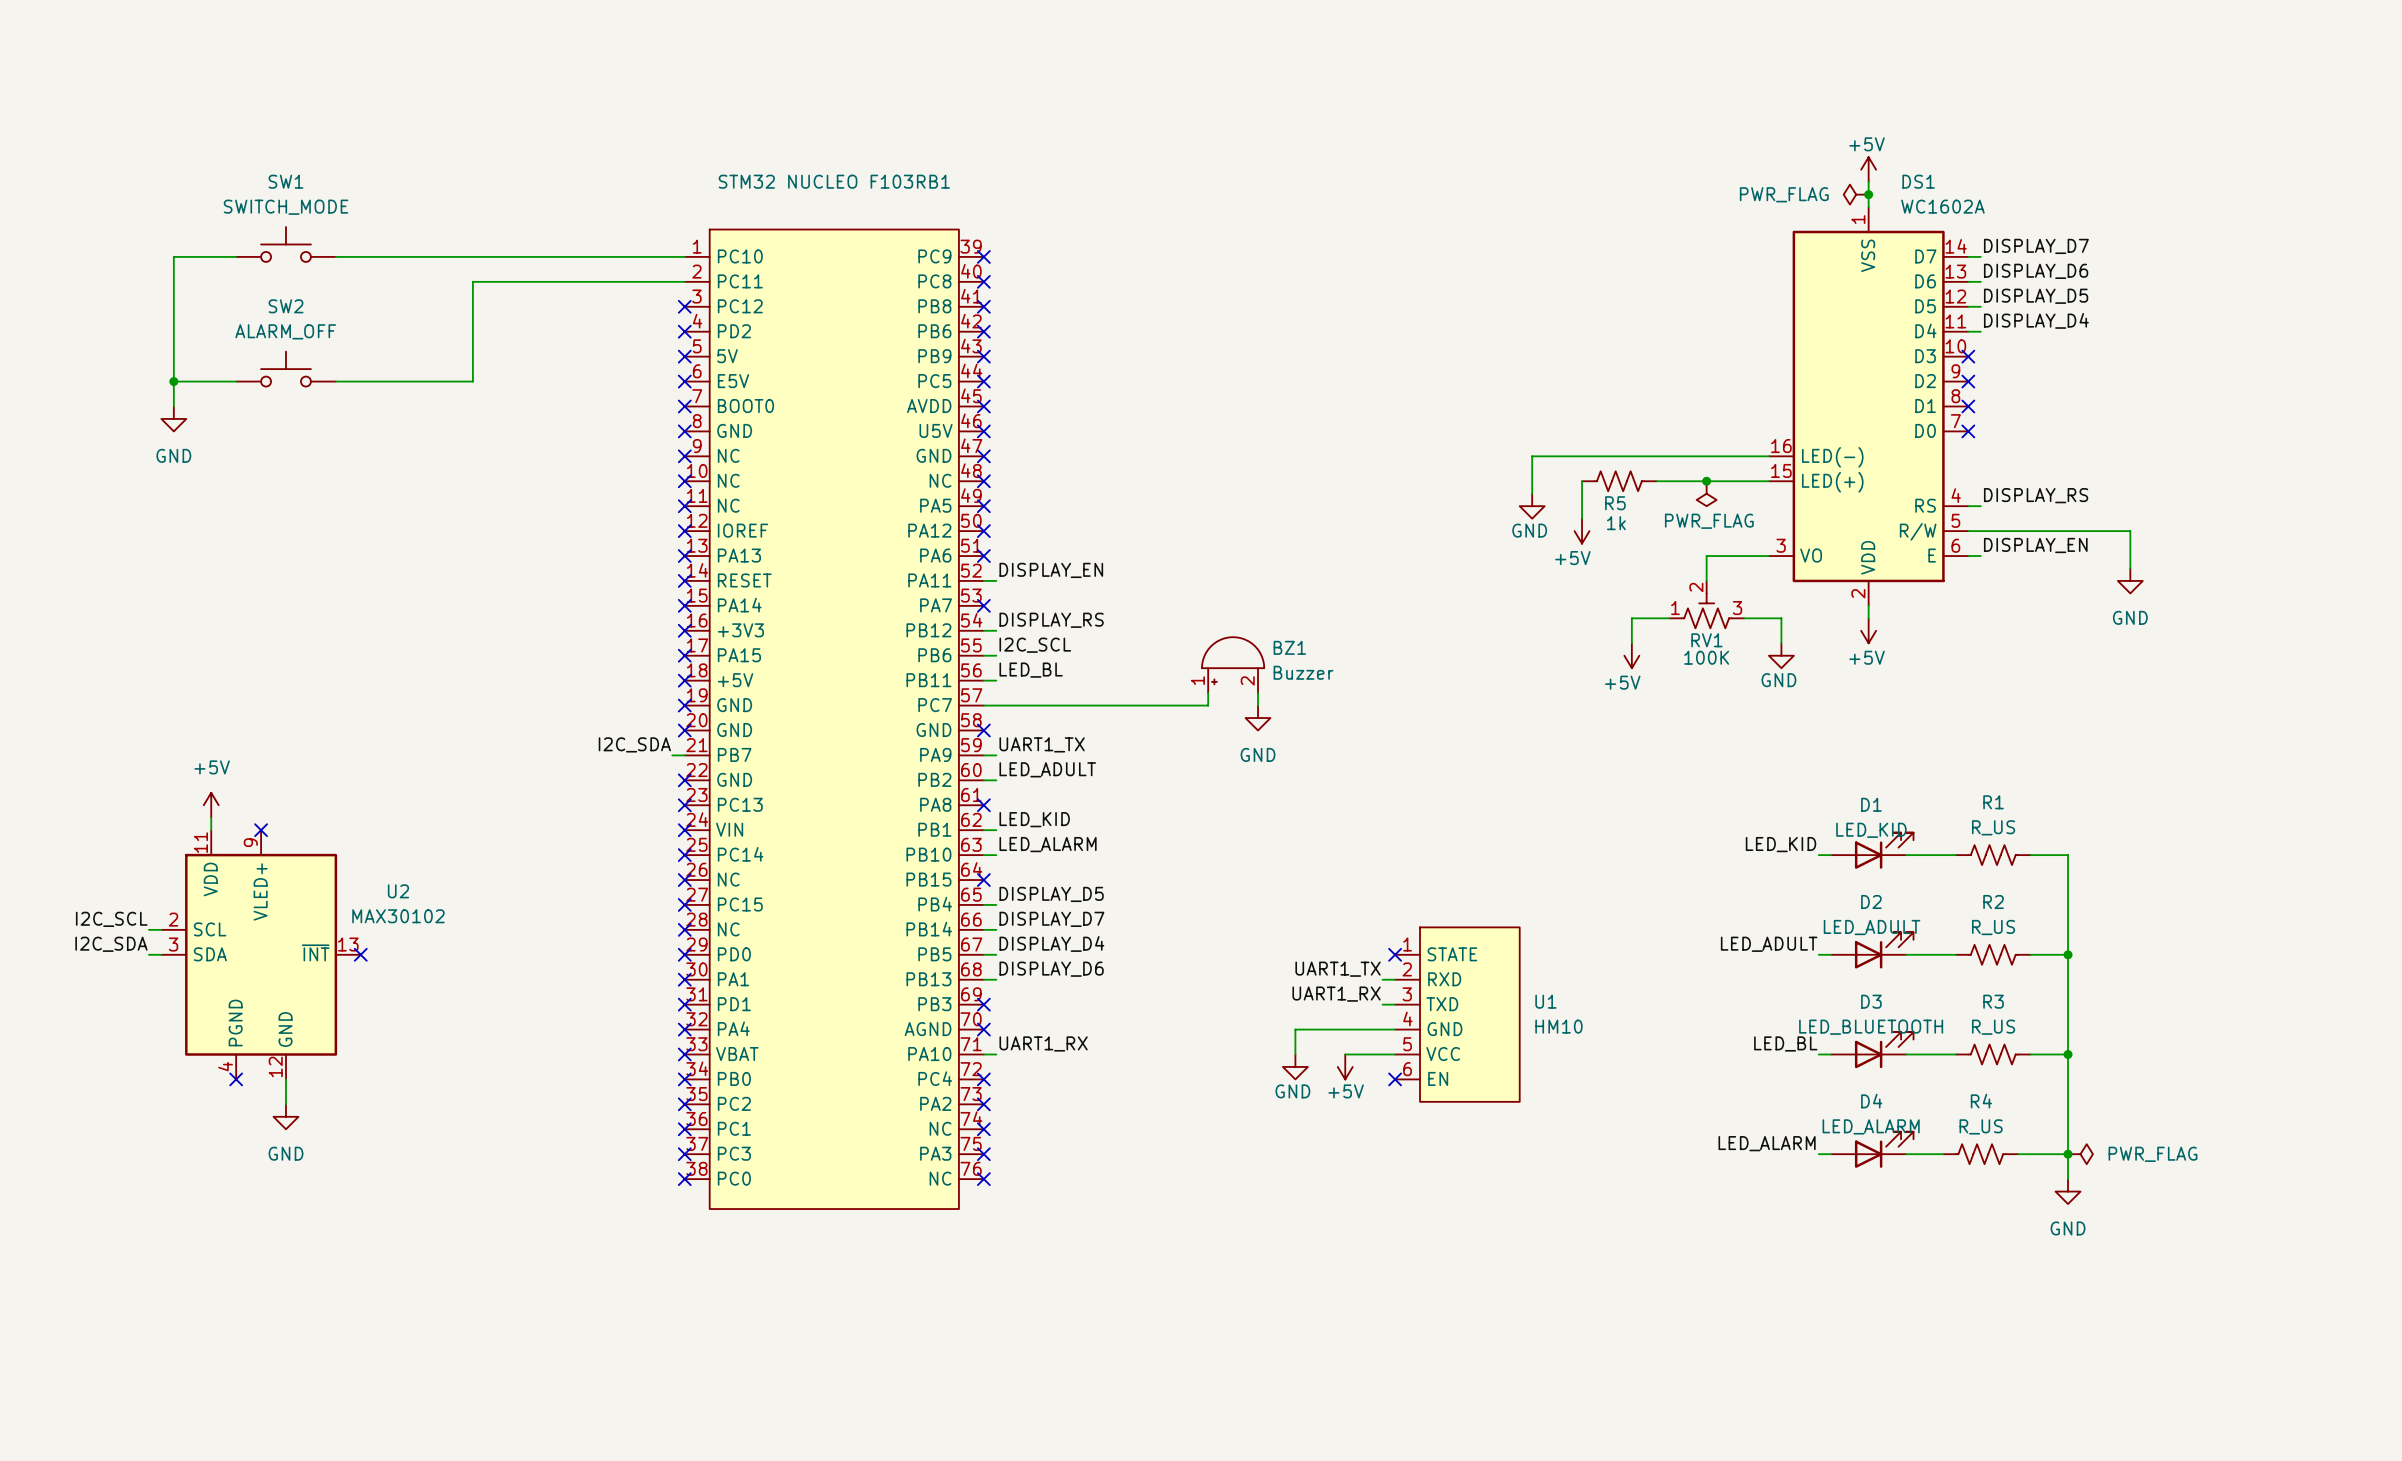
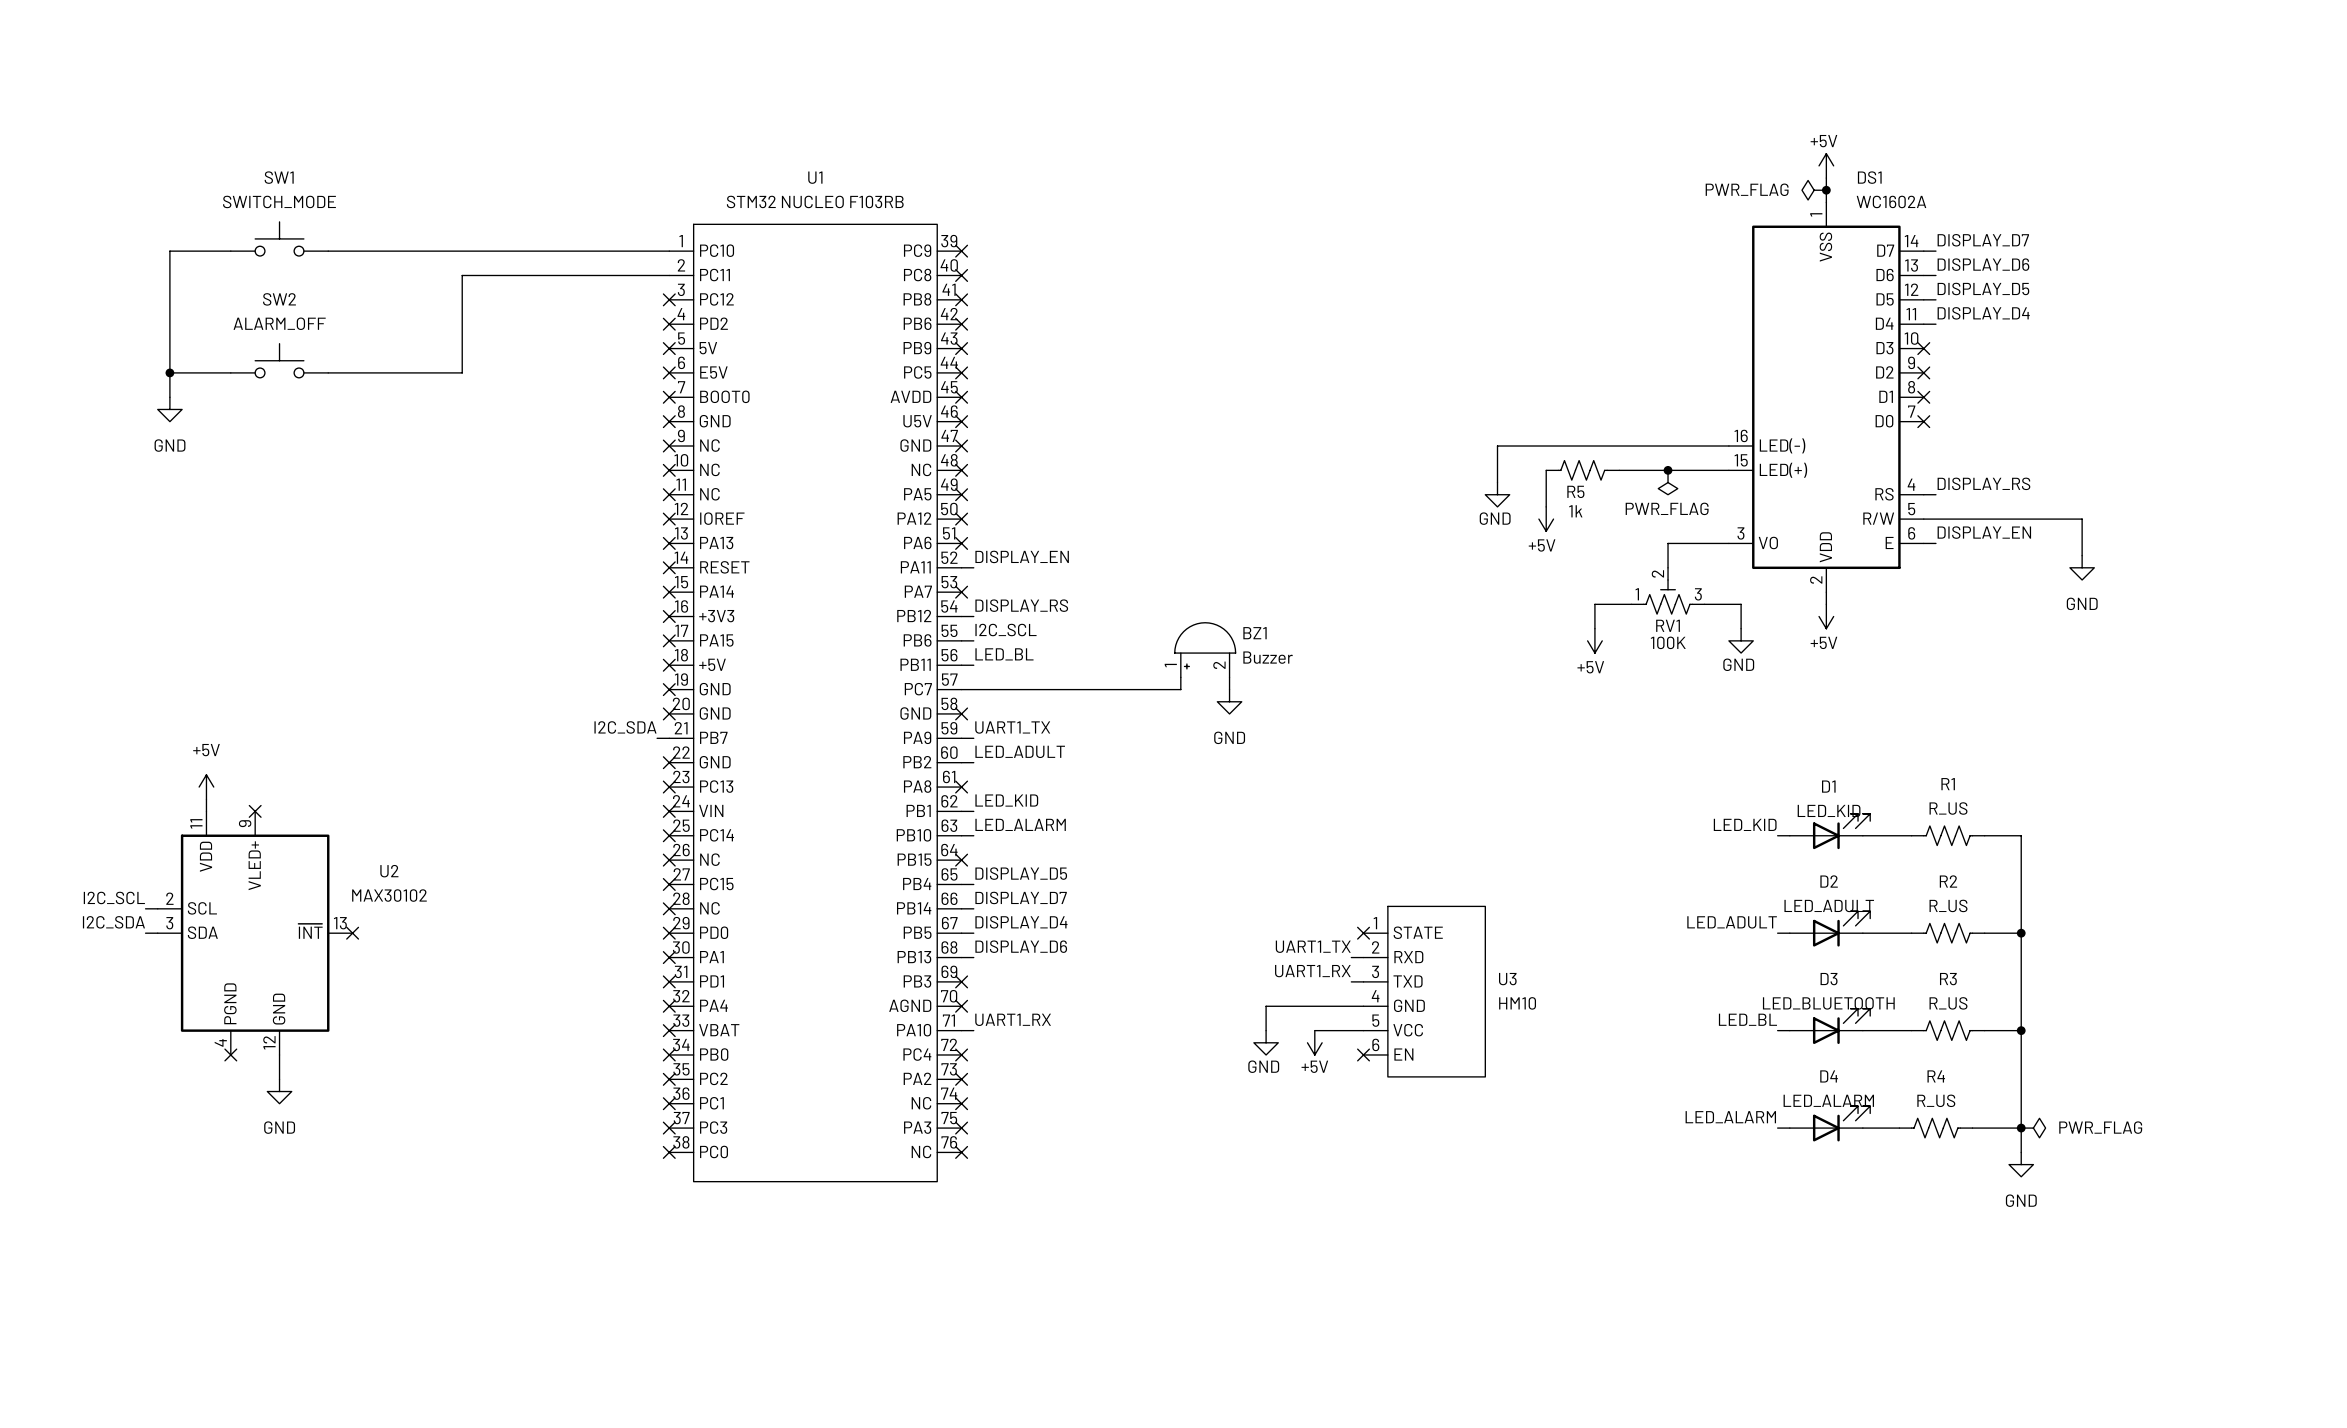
STM32 NUCLEO F103RB1 name: STM32 NUCLEO F103RB1 (834, 181) -> U1 (815, 177)
STM32 NUCLEO F103RB1 value: none -> STM32 NUCLEO F103RB (815, 201)
U1 name: U1 (1545, 1001) -> U3 (1507, 979)

